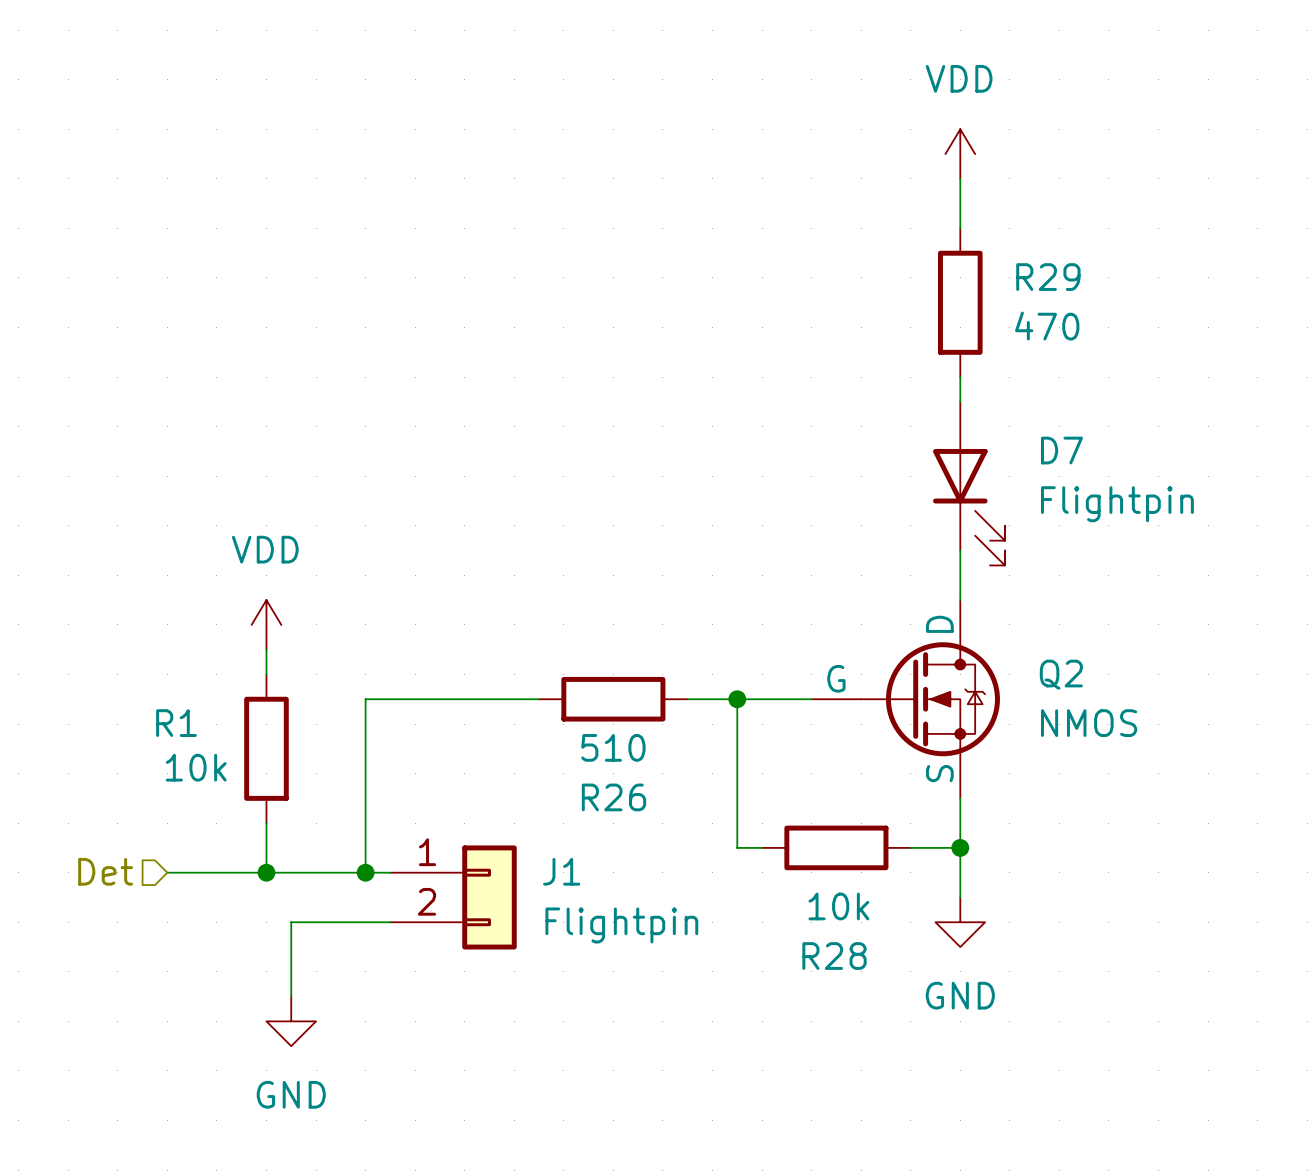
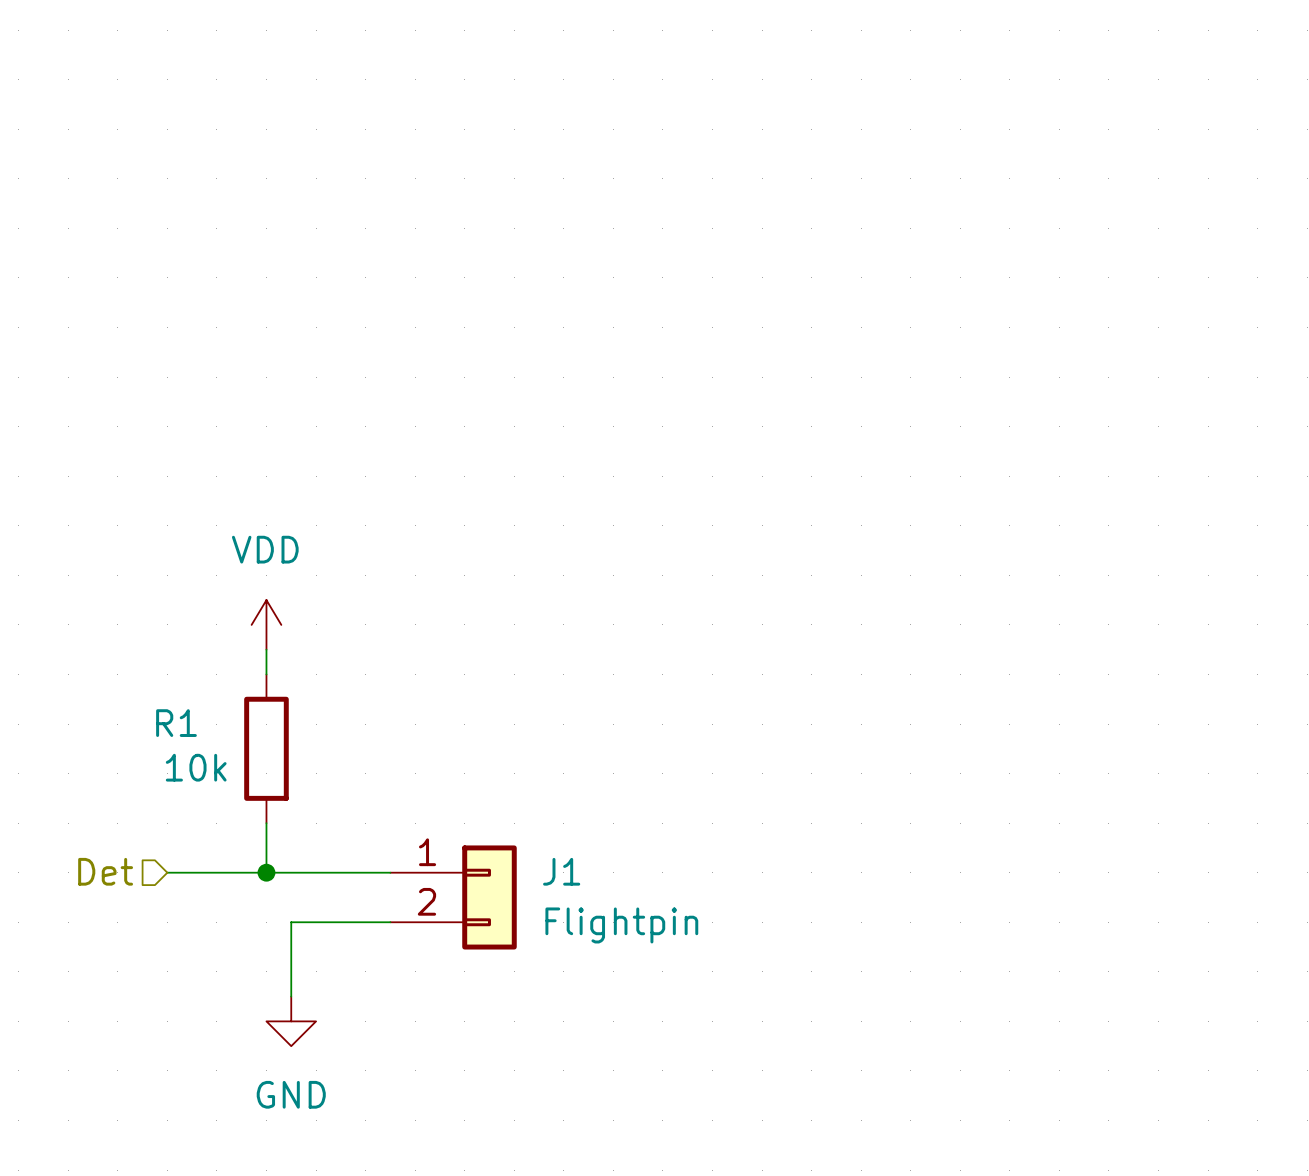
power symbol: VDD (960, 154) -> none
wire: (960, 178) (960, 228) -> none
R29: 470 (960, 302) -> none
wire: (960, 377) (960, 401) -> none
D7: Flightpin (968, 483) -> none
wire: (960, 550) (960, 600) -> none
wire: (539, 699) (365, 699) (365, 872) -> none
R26: 510 (613, 699) -> none
wire: (687, 699) (811, 699) -> none
wire: (737, 699) (737, 847) (762, 847) -> none
junction: (737, 699) -> none
Q2: NMOS (905, 699) -> none
wire: (960, 798) (960, 897) -> none
R28: 10k (836, 847) -> none
wire: (910, 847) (960, 847) -> none
junction: (960, 847) -> none
junction: (365, 872) -> none
power symbol: GND (960, 922) -> none

